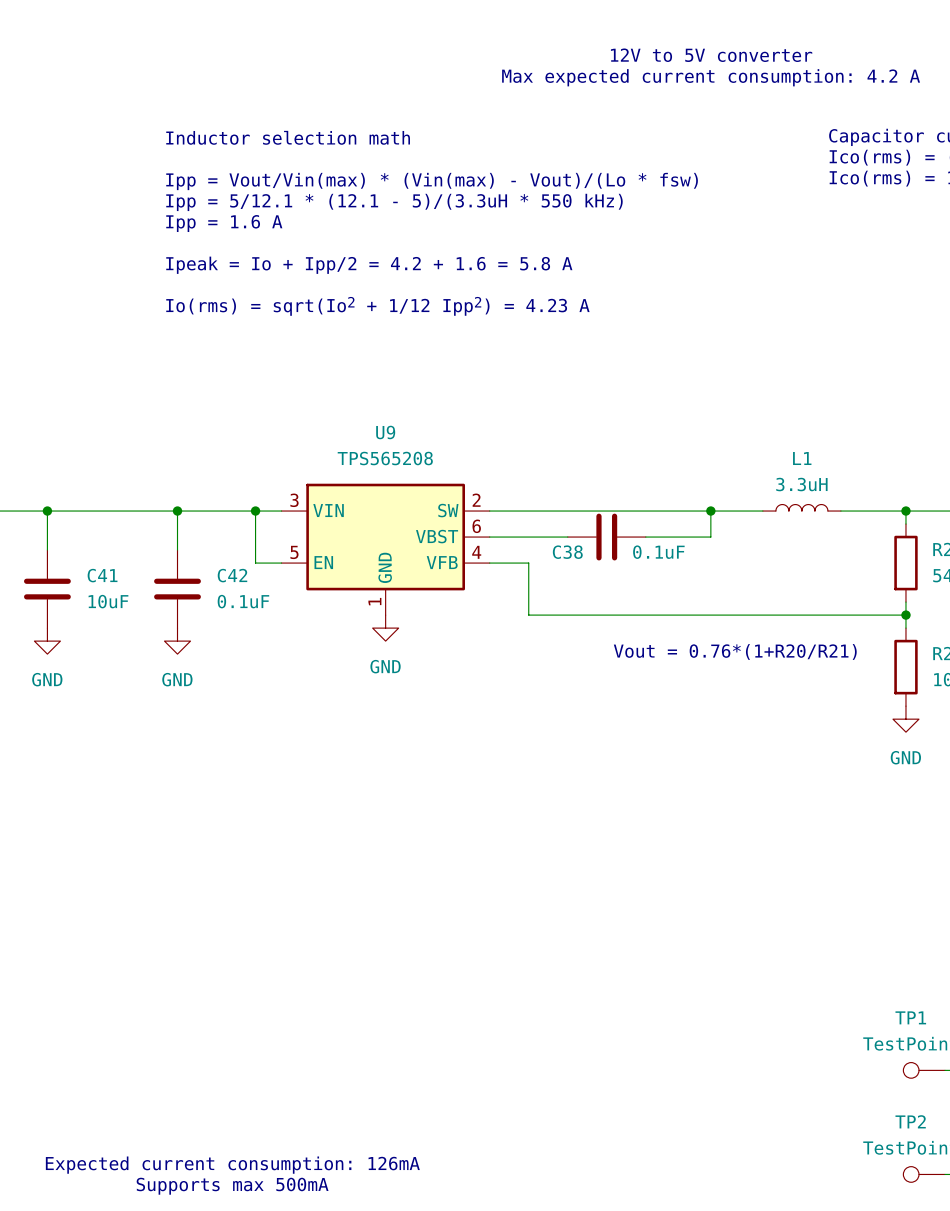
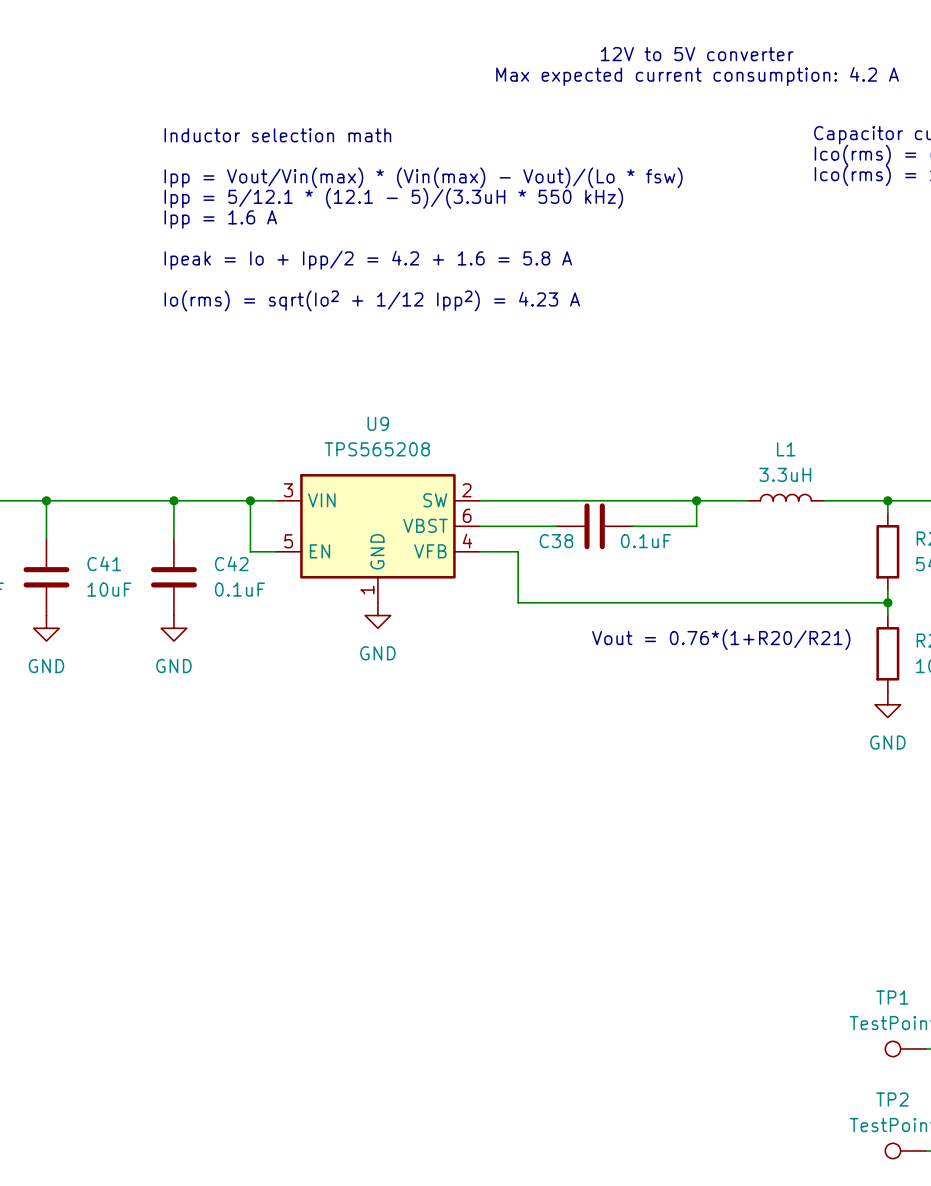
text: Expected current consumption: 126mA (232, 1165) -> none
text: Supports max 500mA (232, 1186) -> none

